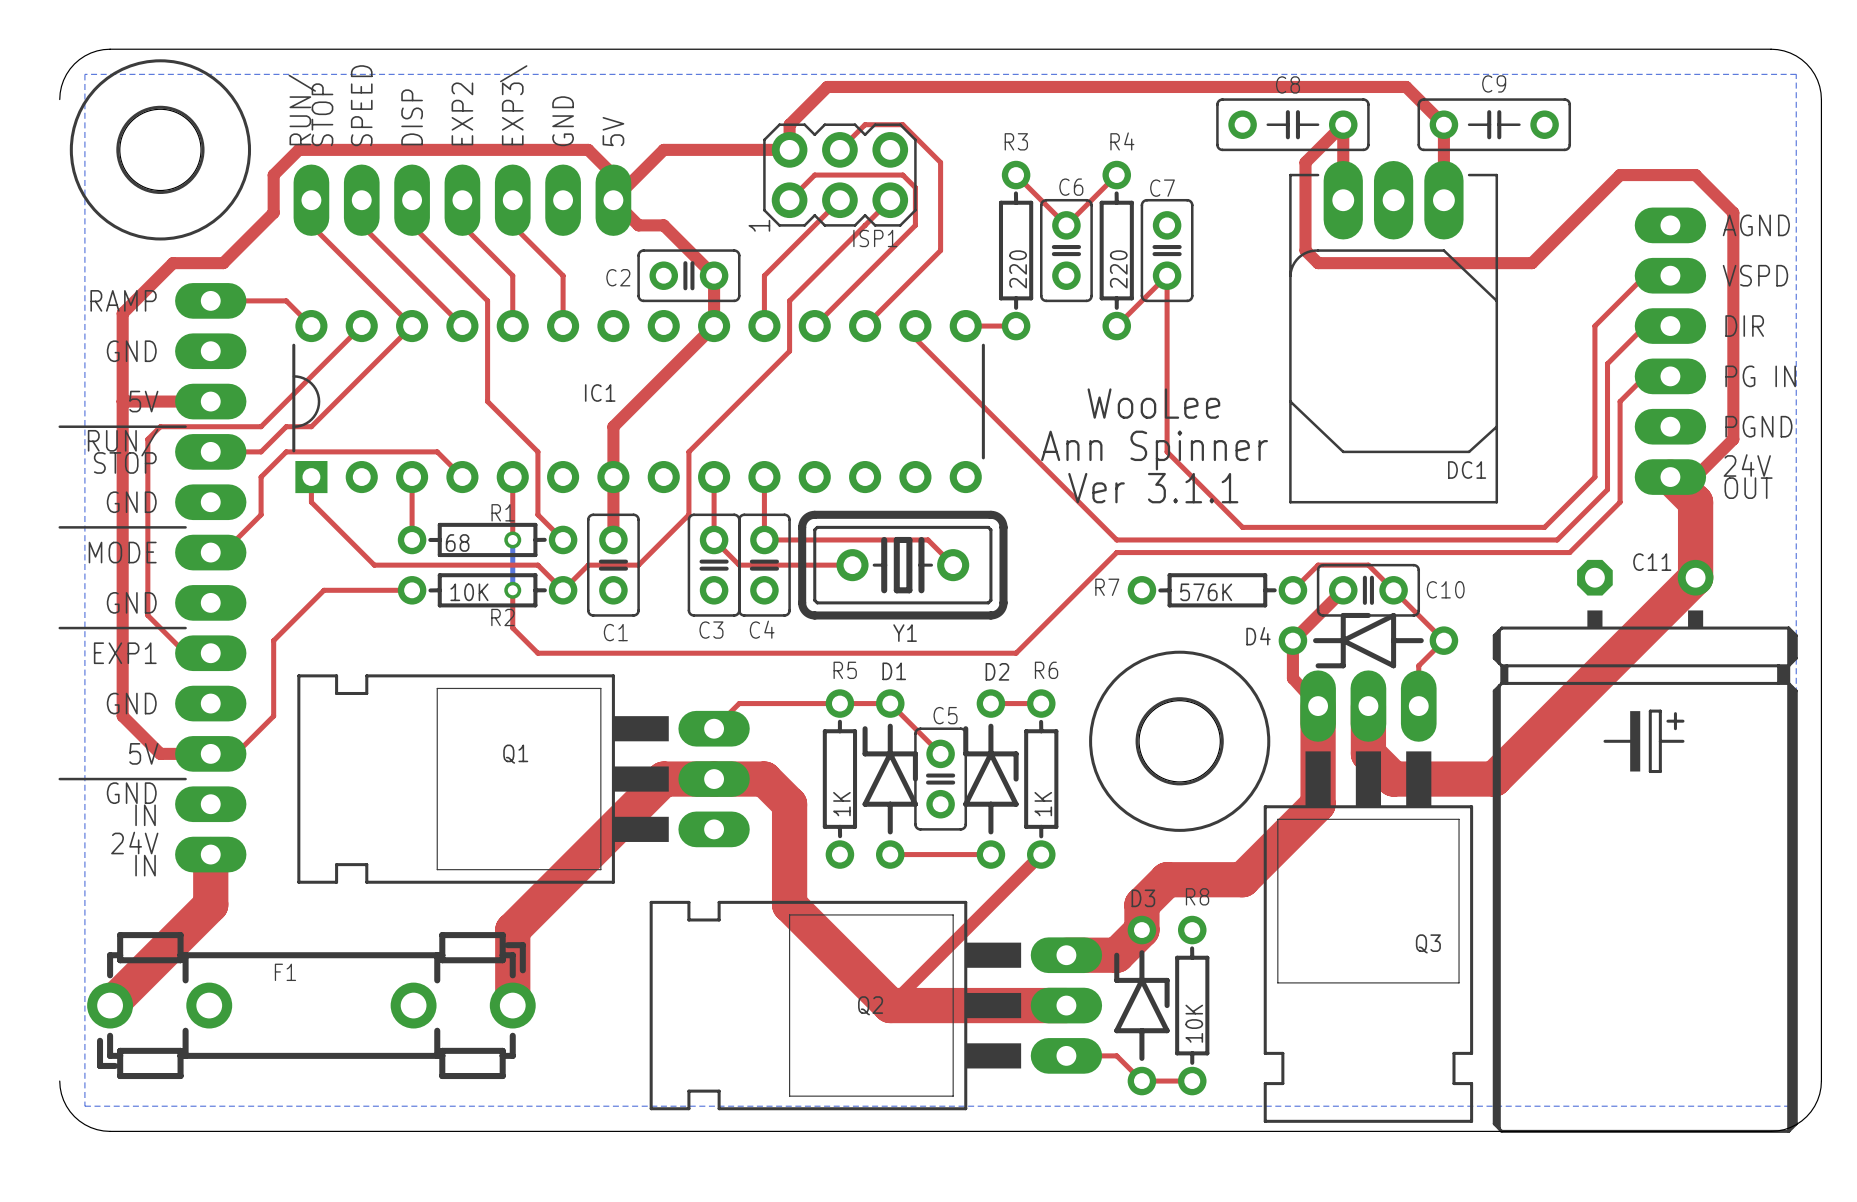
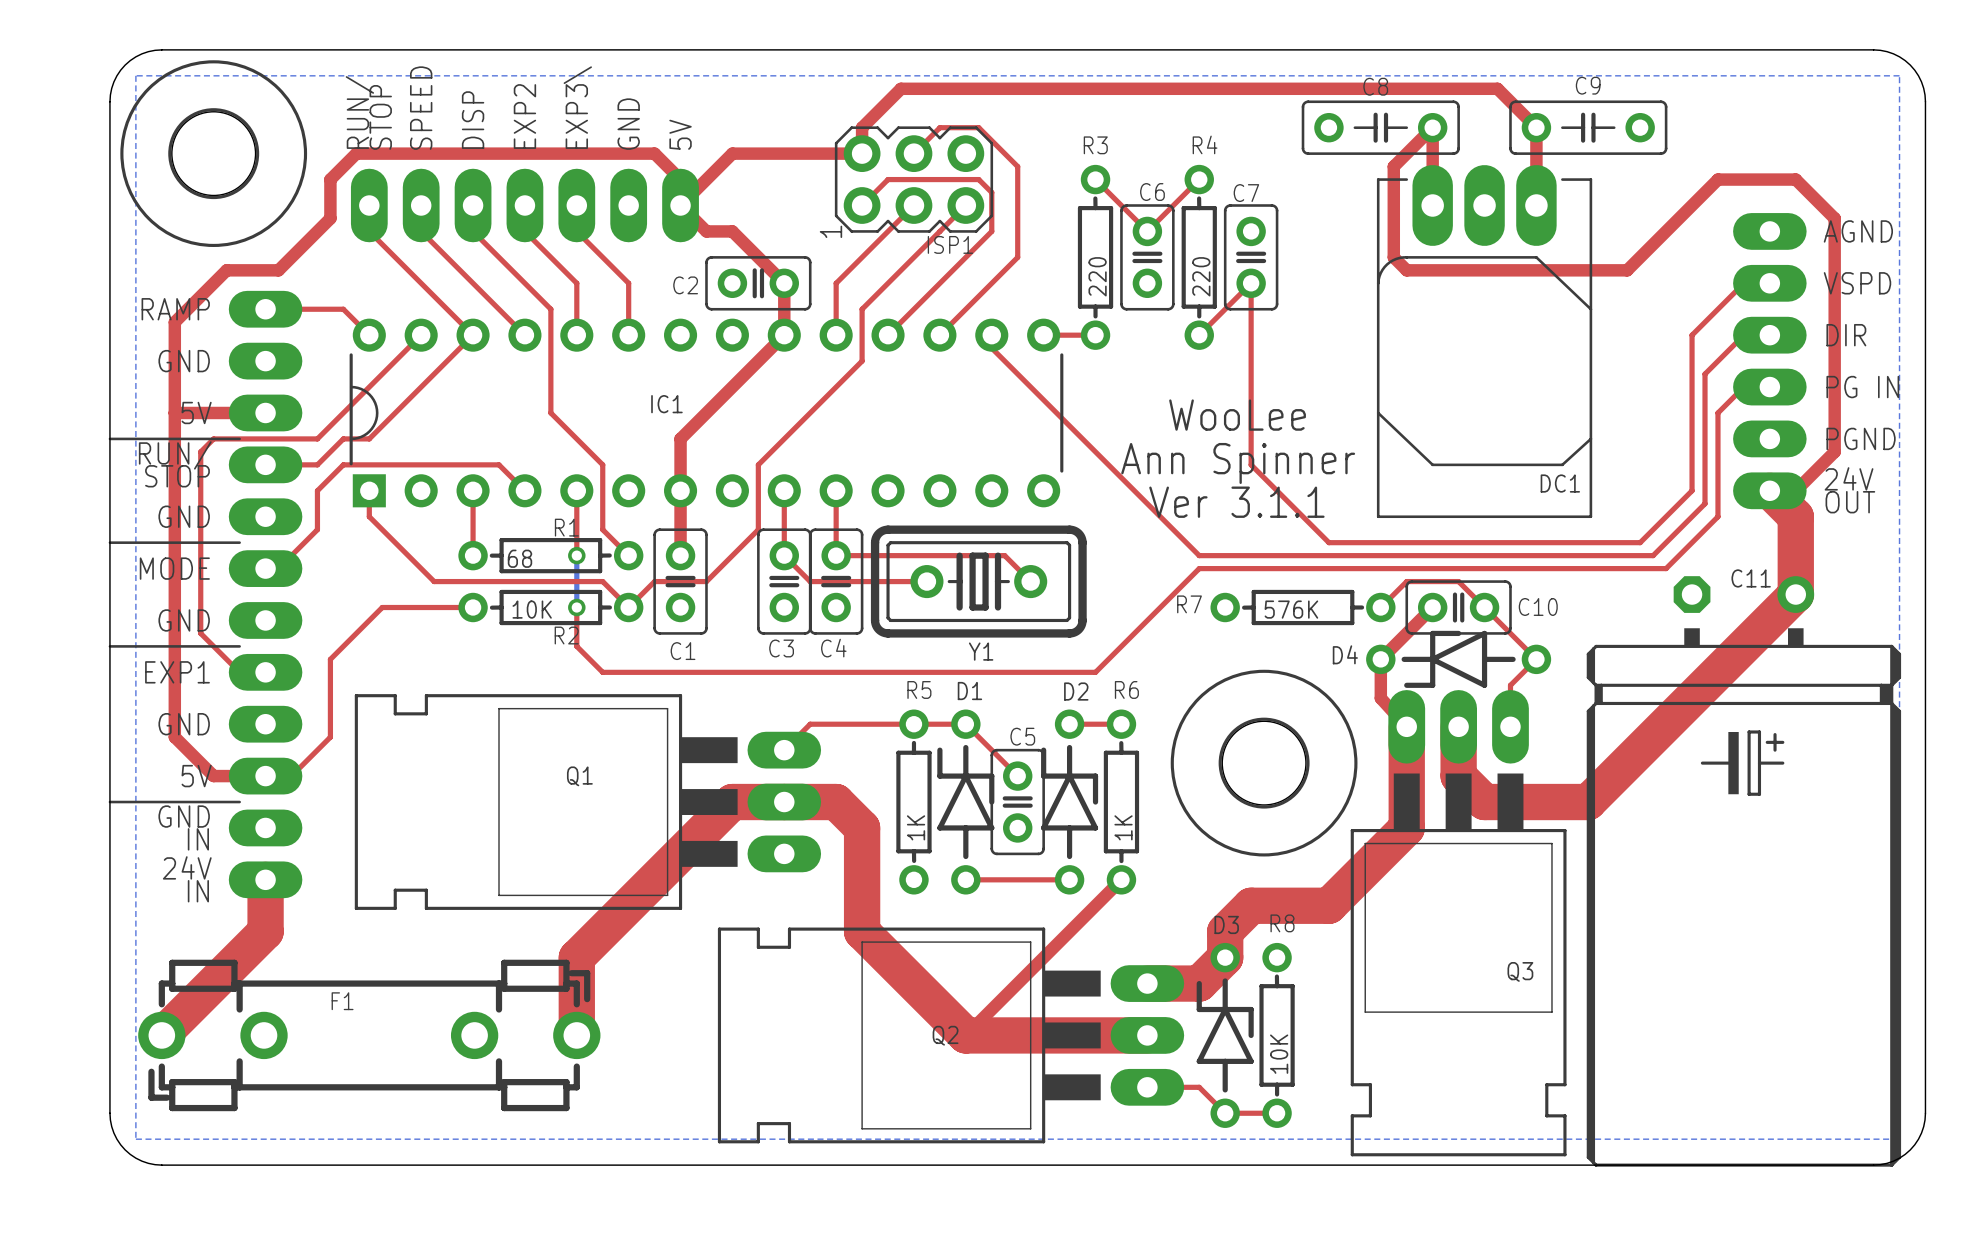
board edge: none -> (109, 101) (109, 1113)

